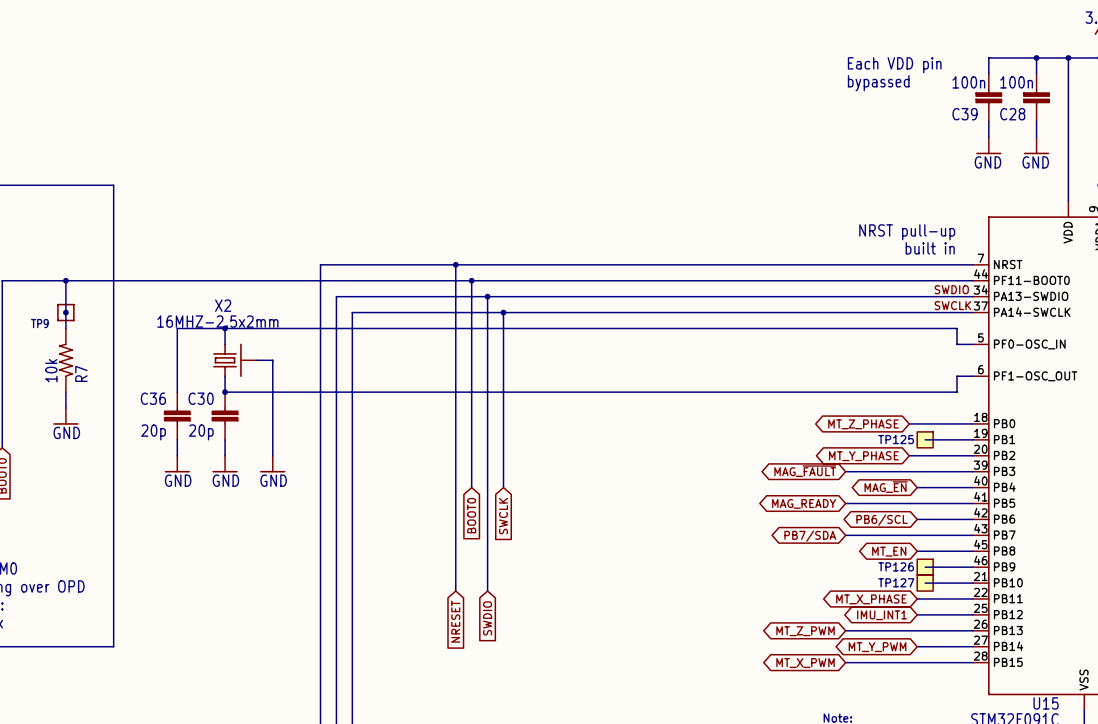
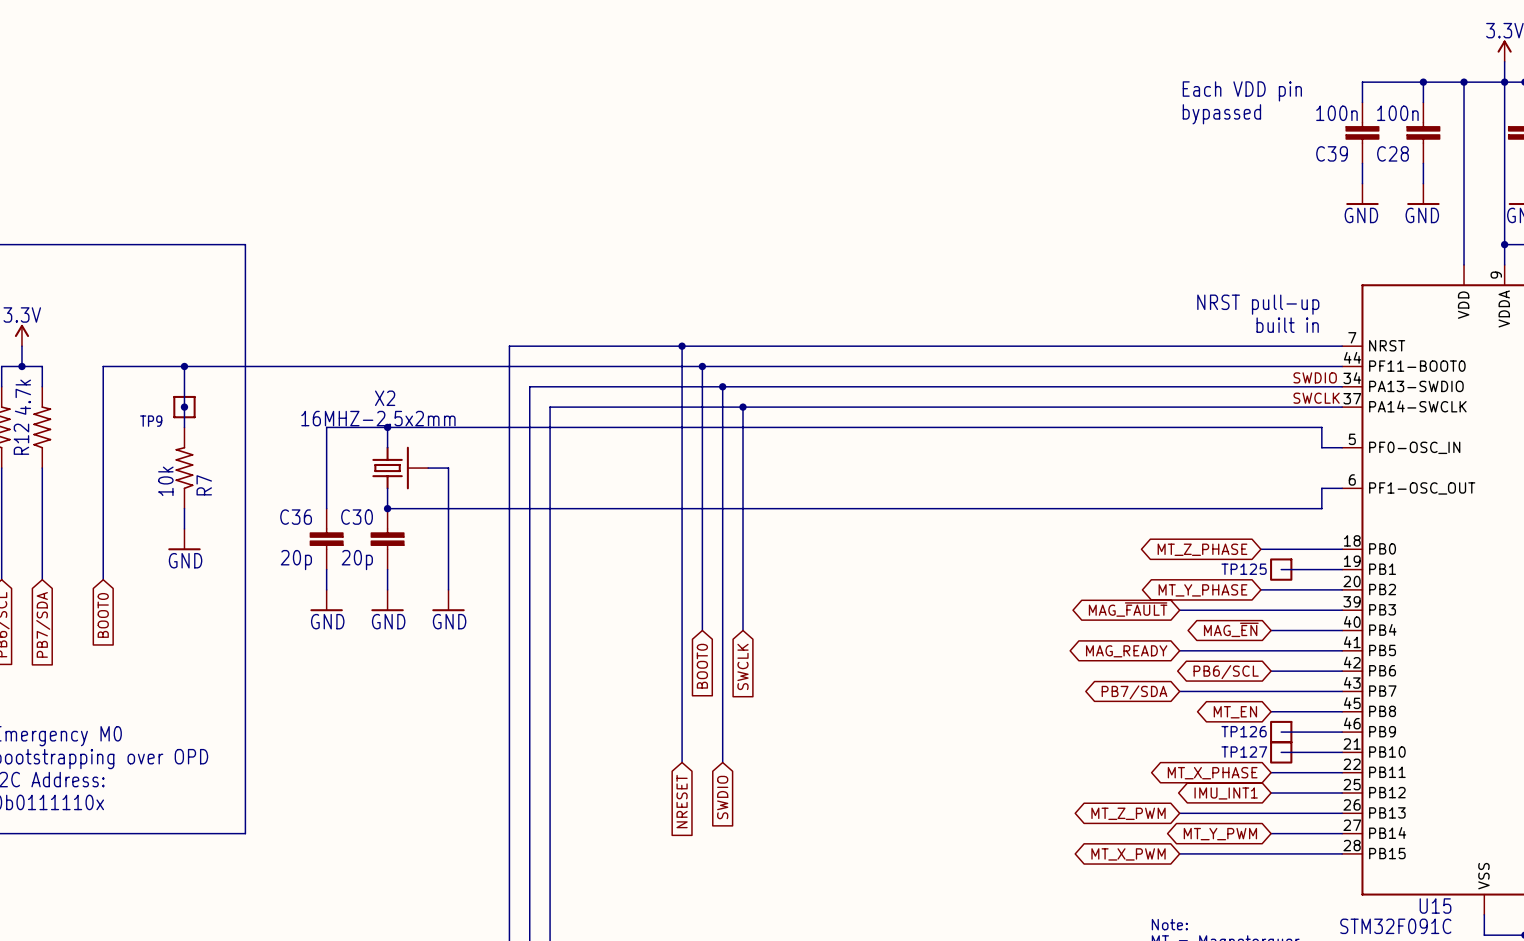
TP125 symbol: [917, 431, 934, 448] -> [1270, 558, 1293, 581]
TP126 symbol: [917, 559, 934, 576] -> [1270, 720, 1293, 744]
TP127 symbol: [917, 575, 934, 592] -> [1270, 741, 1293, 764]

